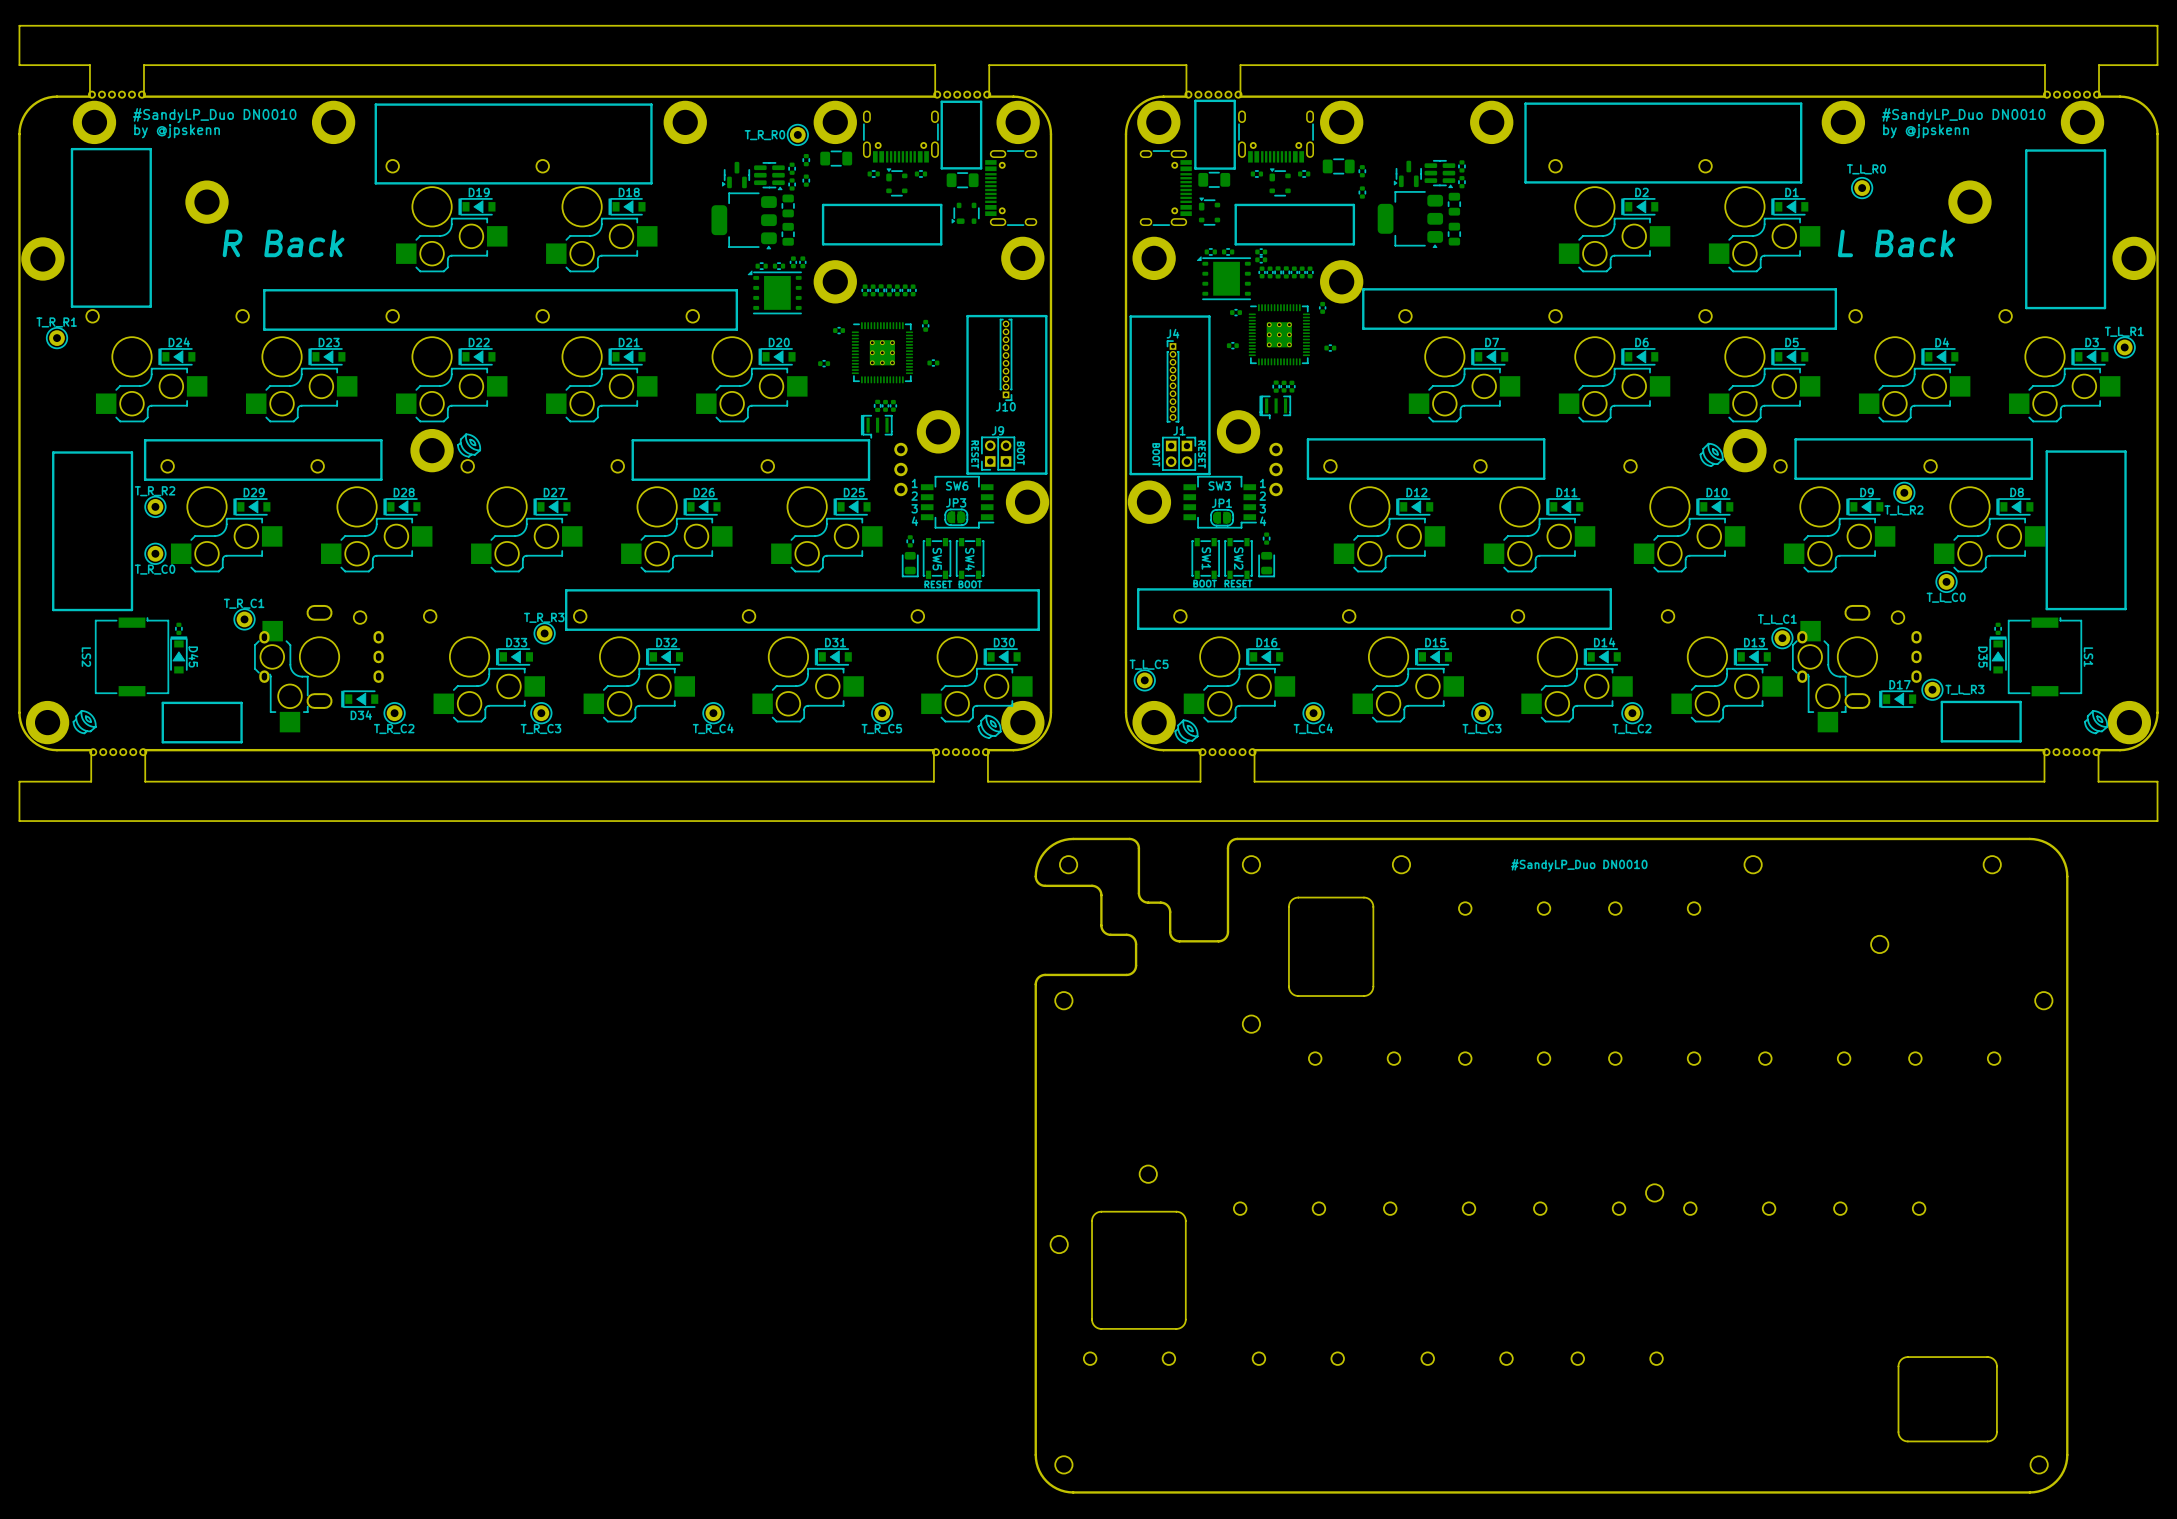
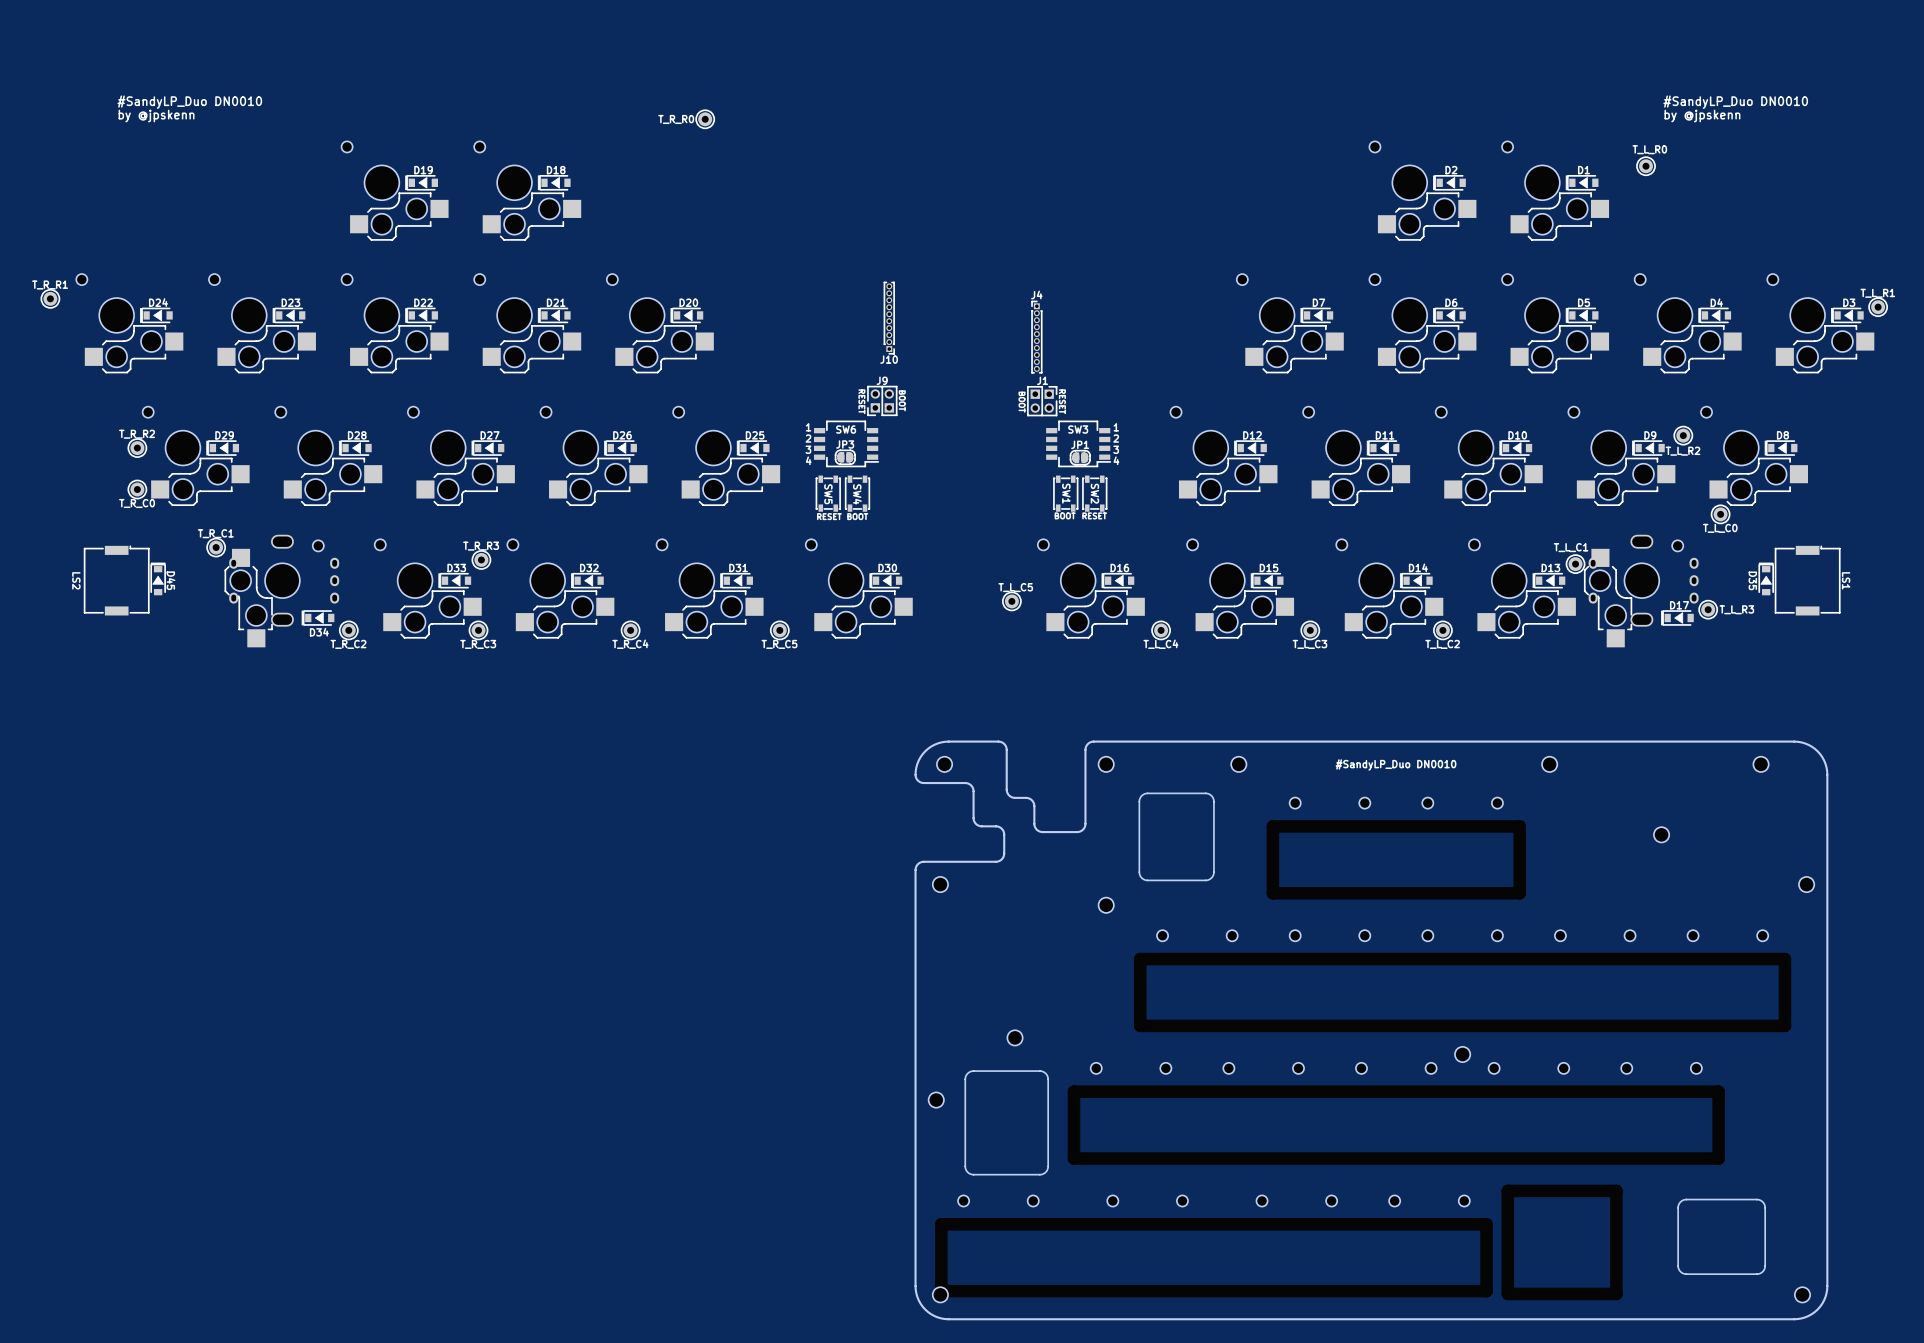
line: (1234, 100) (1195, 100) (1195, 168) (1234, 168) (1234, 100) -> none
line: (981, 101) (941, 101) (941, 168) (981, 168) (981, 101) -> none
line: (1801, 103) (1525, 103) (1525, 182) (1801, 182) (1801, 103) -> none
line: (651, 104) (375, 104) (375, 183) (651, 183) (651, 104) -> none
part: (94, 122) -> none
part: (333, 122) -> none
part: (685, 122) -> none
part: (835, 122) -> none
part: (1018, 122) -> none
part: (1158, 122) -> none
part: (1341, 122) -> none
part: (1491, 122) -> none
part: (1843, 122) -> none
part: (2082, 122) -> none
part: (900, 136) -> none
part: (1276, 136) -> none
line: (150, 149) (71, 149) (71, 306) (150, 306) (150, 149) -> none
line: (2105, 150) (2026, 150) (2026, 308) (2105, 308) (2105, 150) -> none
part: (836, 158) -> none
part: (806, 160) -> none
part: (1338, 166) -> none
part: (1461, 166) -> none
part: (792, 168) -> none
part: (1362, 171) -> none
part: (873, 173) -> none
part: (920, 173) -> none
part: (1256, 173) -> none
part: (1304, 173) -> none
part: (1407, 173) -> none
part: (1439, 174) -> none
part: (735, 175) -> none
part: (769, 176) -> none
part: (1214, 179) -> none
part: (806, 180) -> none
part: (962, 180) -> none
part: (896, 182) -> none
part: (1280, 182) -> none
part: (1461, 182) -> none
part: (792, 184) -> none
part: (1011, 188) -> none
part: (1165, 188) -> none
part: (1362, 192) -> none
part: (207, 202) -> none
part: (1969, 202) -> none
line: (941, 204) (823, 204) (823, 244) (941, 244) (941, 204) -> none
line: (1353, 204) (1235, 204) (1235, 244) (1353, 244) (1353, 204) -> none
part: (1454, 204) -> none
part: (788, 205) -> none
part: (1209, 211) -> none
part: (965, 213) -> none
part: (1410, 219) -> none
part: (744, 221) -> none
part: (788, 234) -> none
part: (1454, 234) -> none
text: R Back (283, 243) -> none
text: L Back (1896, 243) -> none
part: (1210, 251) -> none
part: (1228, 251) -> none
part: (1261, 251) -> none
part: (42, 258) -> none
part: (1022, 258) -> none
part: (1154, 258) -> none
part: (2134, 258) -> none
part: (1261, 259) -> none
part: (793, 262) -> none
part: (802, 262) -> none
part: (761, 266) -> none
part: (779, 266) -> none
part: (1262, 272) -> none
part: (1270, 272) -> none
part: (1278, 272) -> none
part: (1286, 272) -> none
part: (1294, 272) -> none
part: (1302, 272) -> none
part: (1310, 272) -> none
part: (1223, 278) -> none
part: (835, 281) -> none
part: (1341, 281) -> none
line: (1835, 289) (1363, 289) (1363, 328) (1835, 328) (1835, 289) -> none
line: (736, 290) (264, 290) (264, 329) (736, 329) (736, 290) -> none
part: (865, 290) -> none
part: (873, 290) -> none
part: (881, 290) -> none
part: (889, 290) -> none
part: (897, 290) -> none
part: (905, 290) -> none
part: (913, 290) -> none
part: (774, 292) -> none
part: (1322, 307) -> none
part: (1236, 312) -> none
line: (1046, 316) (967, 316) (967, 473) (1046, 473) (1046, 316) -> none
line: (1209, 316) (1130, 316) (1130, 474) (1209, 474) (1209, 316) -> none
part: (925, 325) -> none
part: (839, 330) -> none
part: (1279, 334) -> none
part: (1232, 345) -> none
part: (1330, 348) -> none
part: (882, 352) -> none
part: (824, 363) -> none
part: (933, 363) -> none
part: (1276, 386) -> none
part: (1284, 386) -> none
part: (1291, 386) -> none
part: (877, 405) -> none
part: (885, 405) -> none
part: (893, 405) -> none
part: (1275, 407) -> none
part: (1088, 423) -> none
part: (876, 426) -> none
part: (938, 431) -> none
part: (1238, 431) -> none
drawing: [457, 433, 481, 458] -> none
line: (1544, 439) (1307, 439) (1307, 478) (1544, 478) (1544, 439) -> none
line: (2031, 439) (1795, 439) (1795, 478) (2031, 478) (2031, 439) -> none
line: (381, 440) (145, 440) (145, 479) (381, 479) (381, 440) -> none
line: (869, 440) (632, 440) (632, 479) (869, 479) (869, 440) -> none
drawing: [1699, 443, 1724, 467] -> none
part: (432, 450) -> none
part: (1744, 450) -> none
line: (2125, 451) (2046, 451) (2046, 609) (2125, 609) (2125, 451) -> none
line: (131, 452) (53, 452) (53, 610) (131, 610) (131, 452) -> none
part: (900, 469) -> none
part: (1276, 469) -> none
part: (1027, 502) -> none
part: (1149, 502) -> none
part: (1266, 538) -> none
part: (910, 541) -> none
part: (910, 564) -> none
part: (1266, 564) -> none
line: (1610, 589) (1138, 589) (1138, 628) (1610, 628) (1610, 589) -> none
line: (1038, 590) (566, 590) (566, 629) (1038, 629) (1038, 590) -> none
part: (178, 628) -> none
part: (1998, 628) -> none
line: (2020, 701) (1941, 701) (1941, 741) (2020, 741) (2020, 701) -> none
line: (241, 702) (162, 702) (162, 742) (241, 742) (241, 702) -> none
drawing: [72, 710, 97, 734] -> none
drawing: [2084, 710, 2108, 734] -> none
drawing: [977, 715, 1002, 739] -> none
drawing: [1174, 719, 1199, 744] -> none
part: (47, 722) -> none
part: (1022, 722) -> none
part: (1154, 722) -> none
part: (2129, 722) -> none

